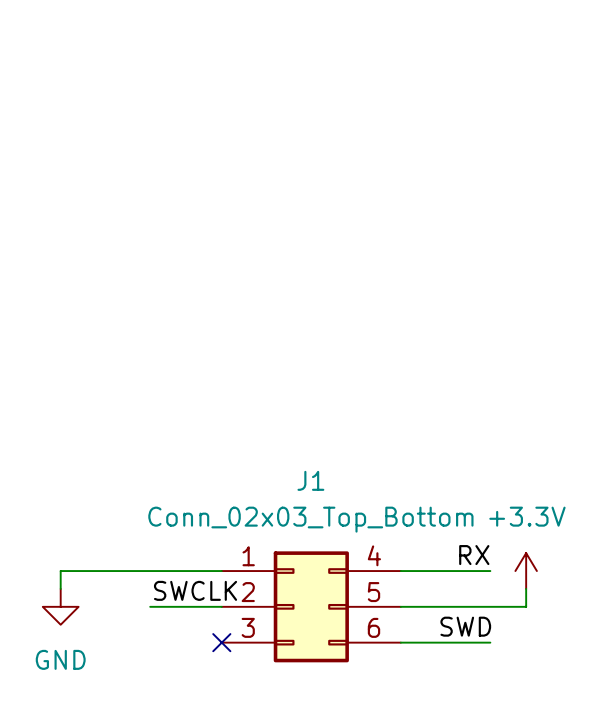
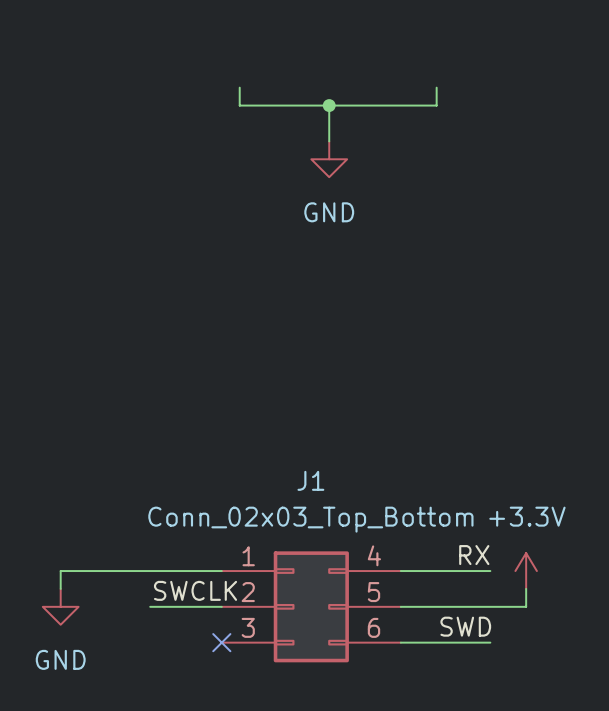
wire: none -> (239, 87) (239, 105) (436, 105) (436, 87)
wire: none -> (329, 105) (329, 141)
junction: none -> (329, 105)
power symbol: none -> GND (329, 159)

